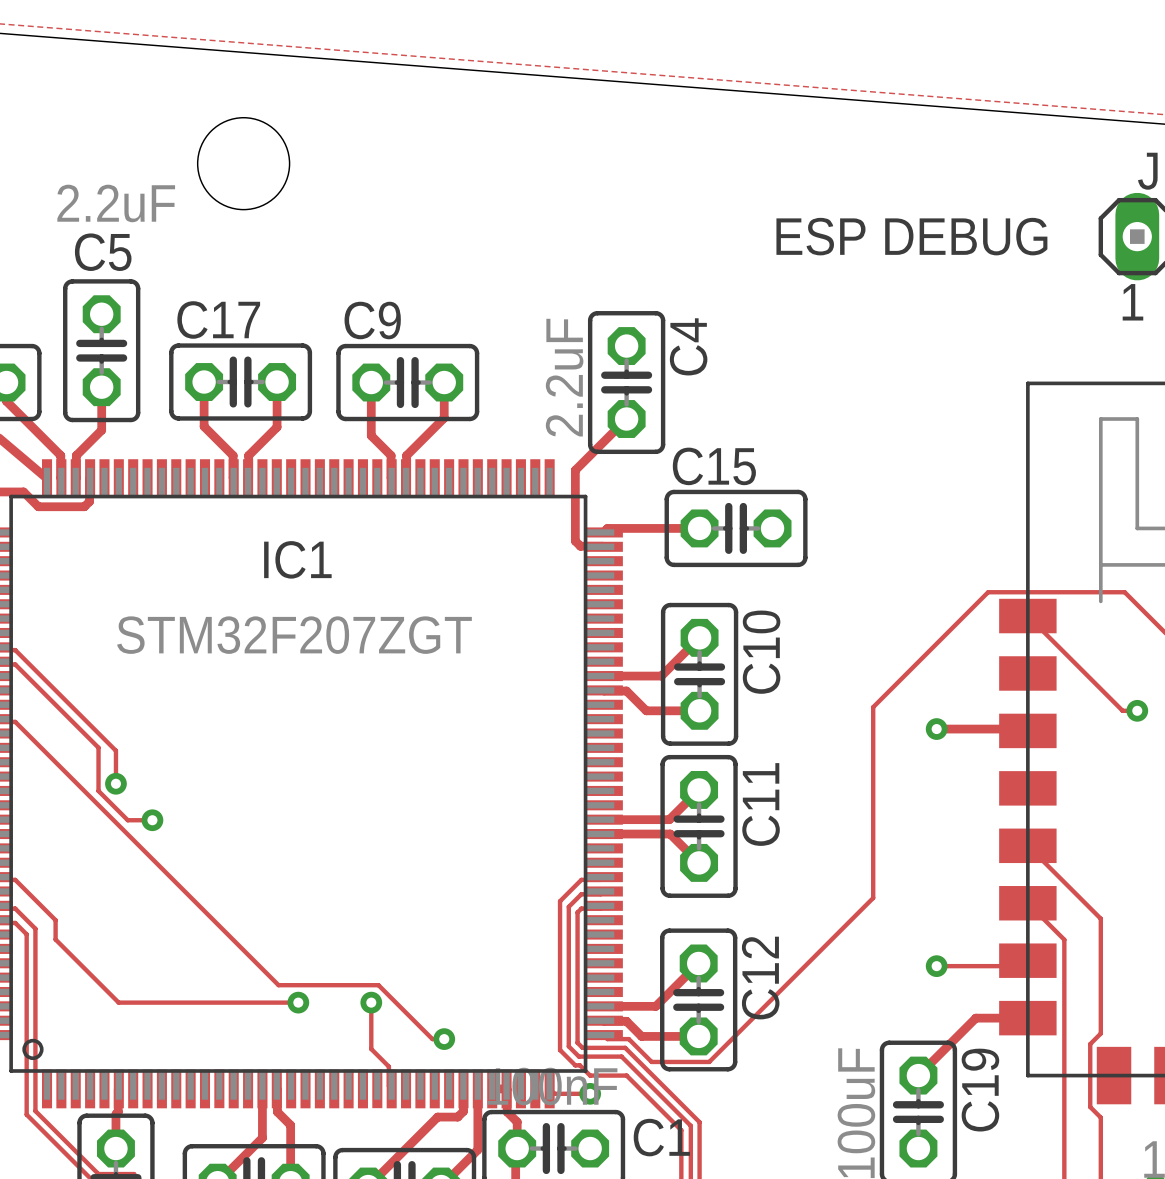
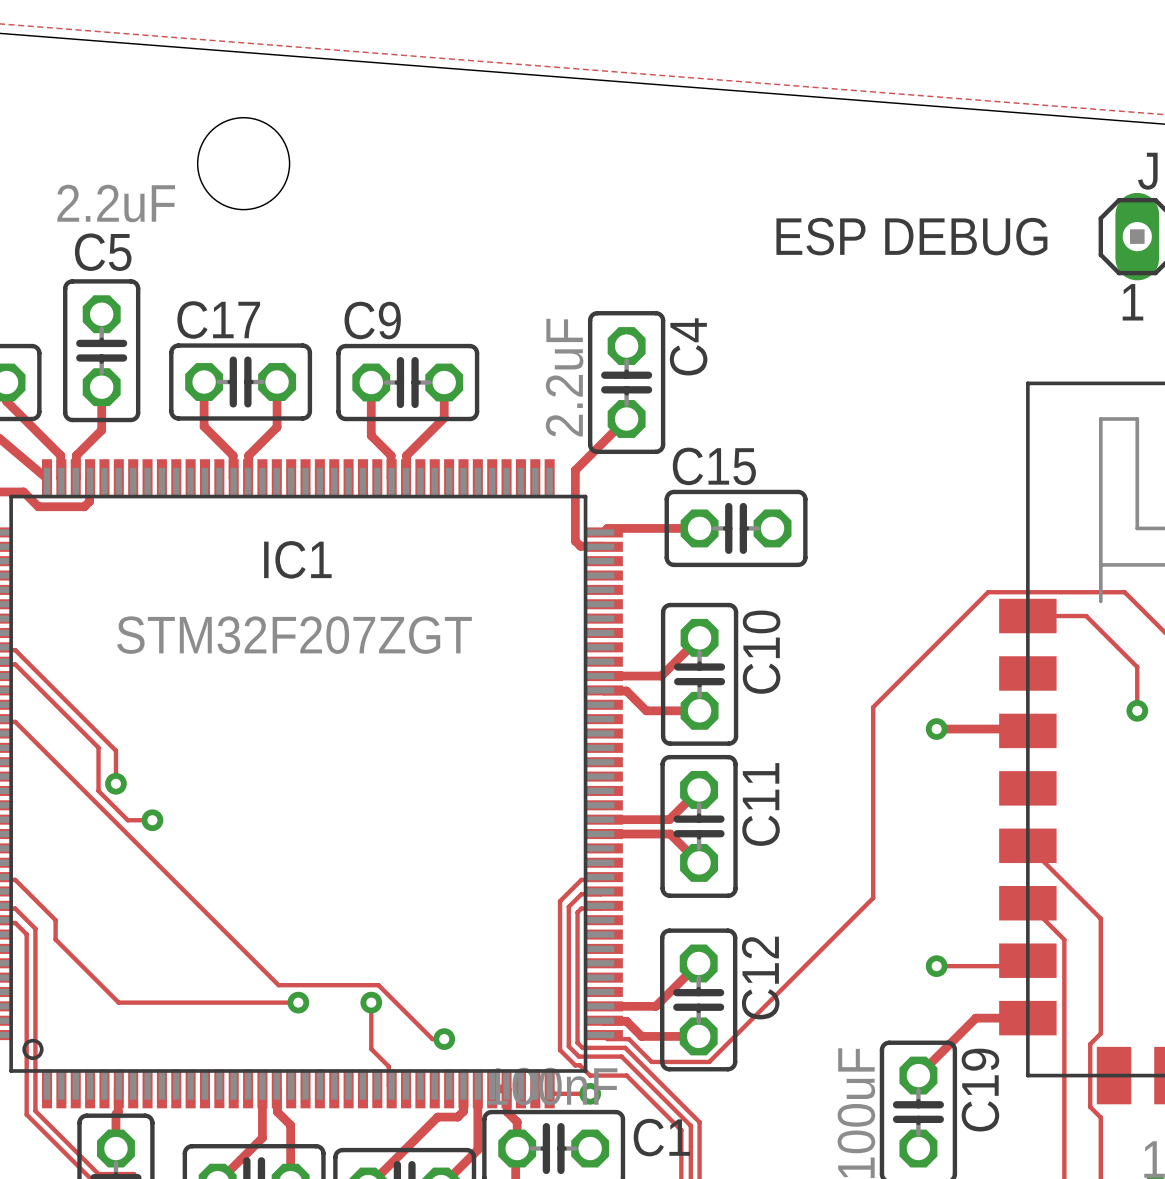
track: (1027, 616) (1122, 710) (1137, 710) -> (1027, 616) (1086, 616) (1137, 667) (1137, 710)

